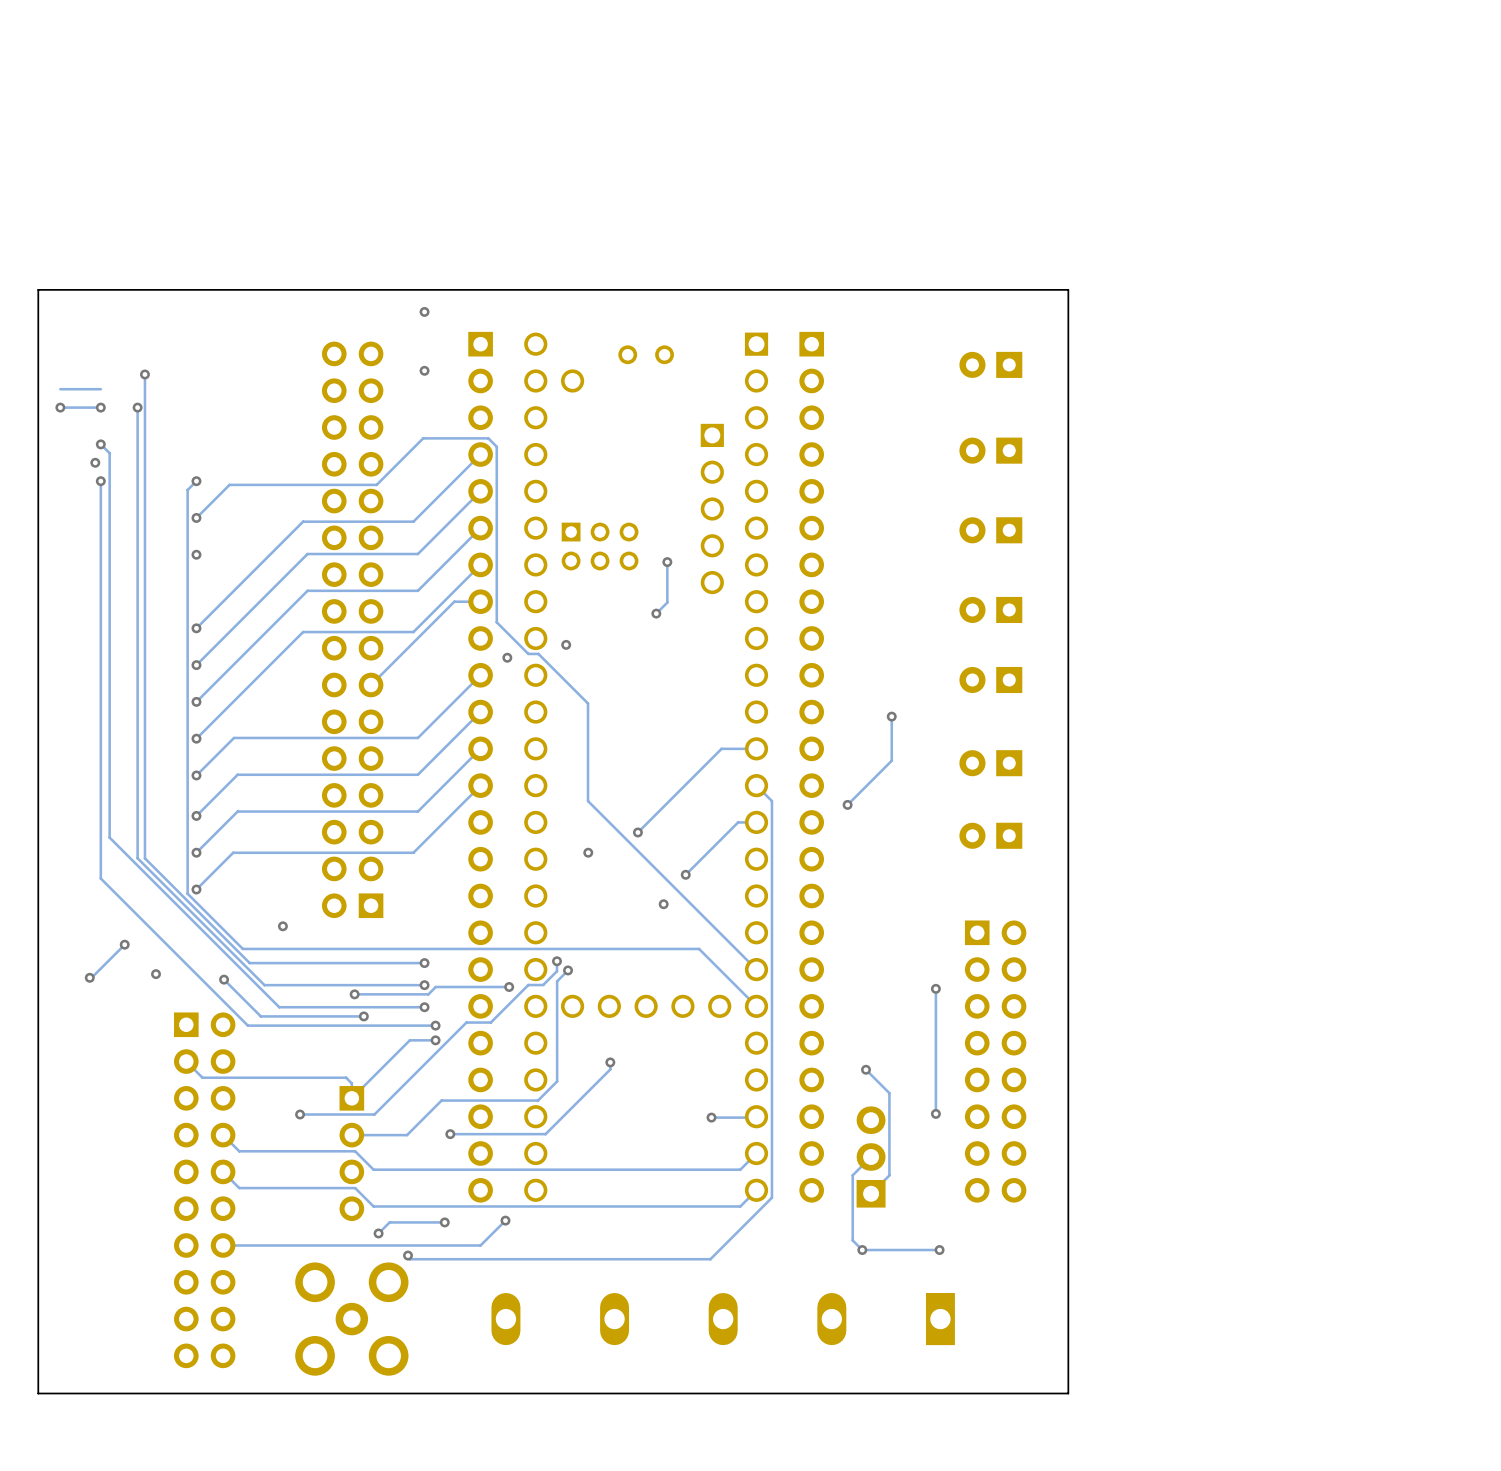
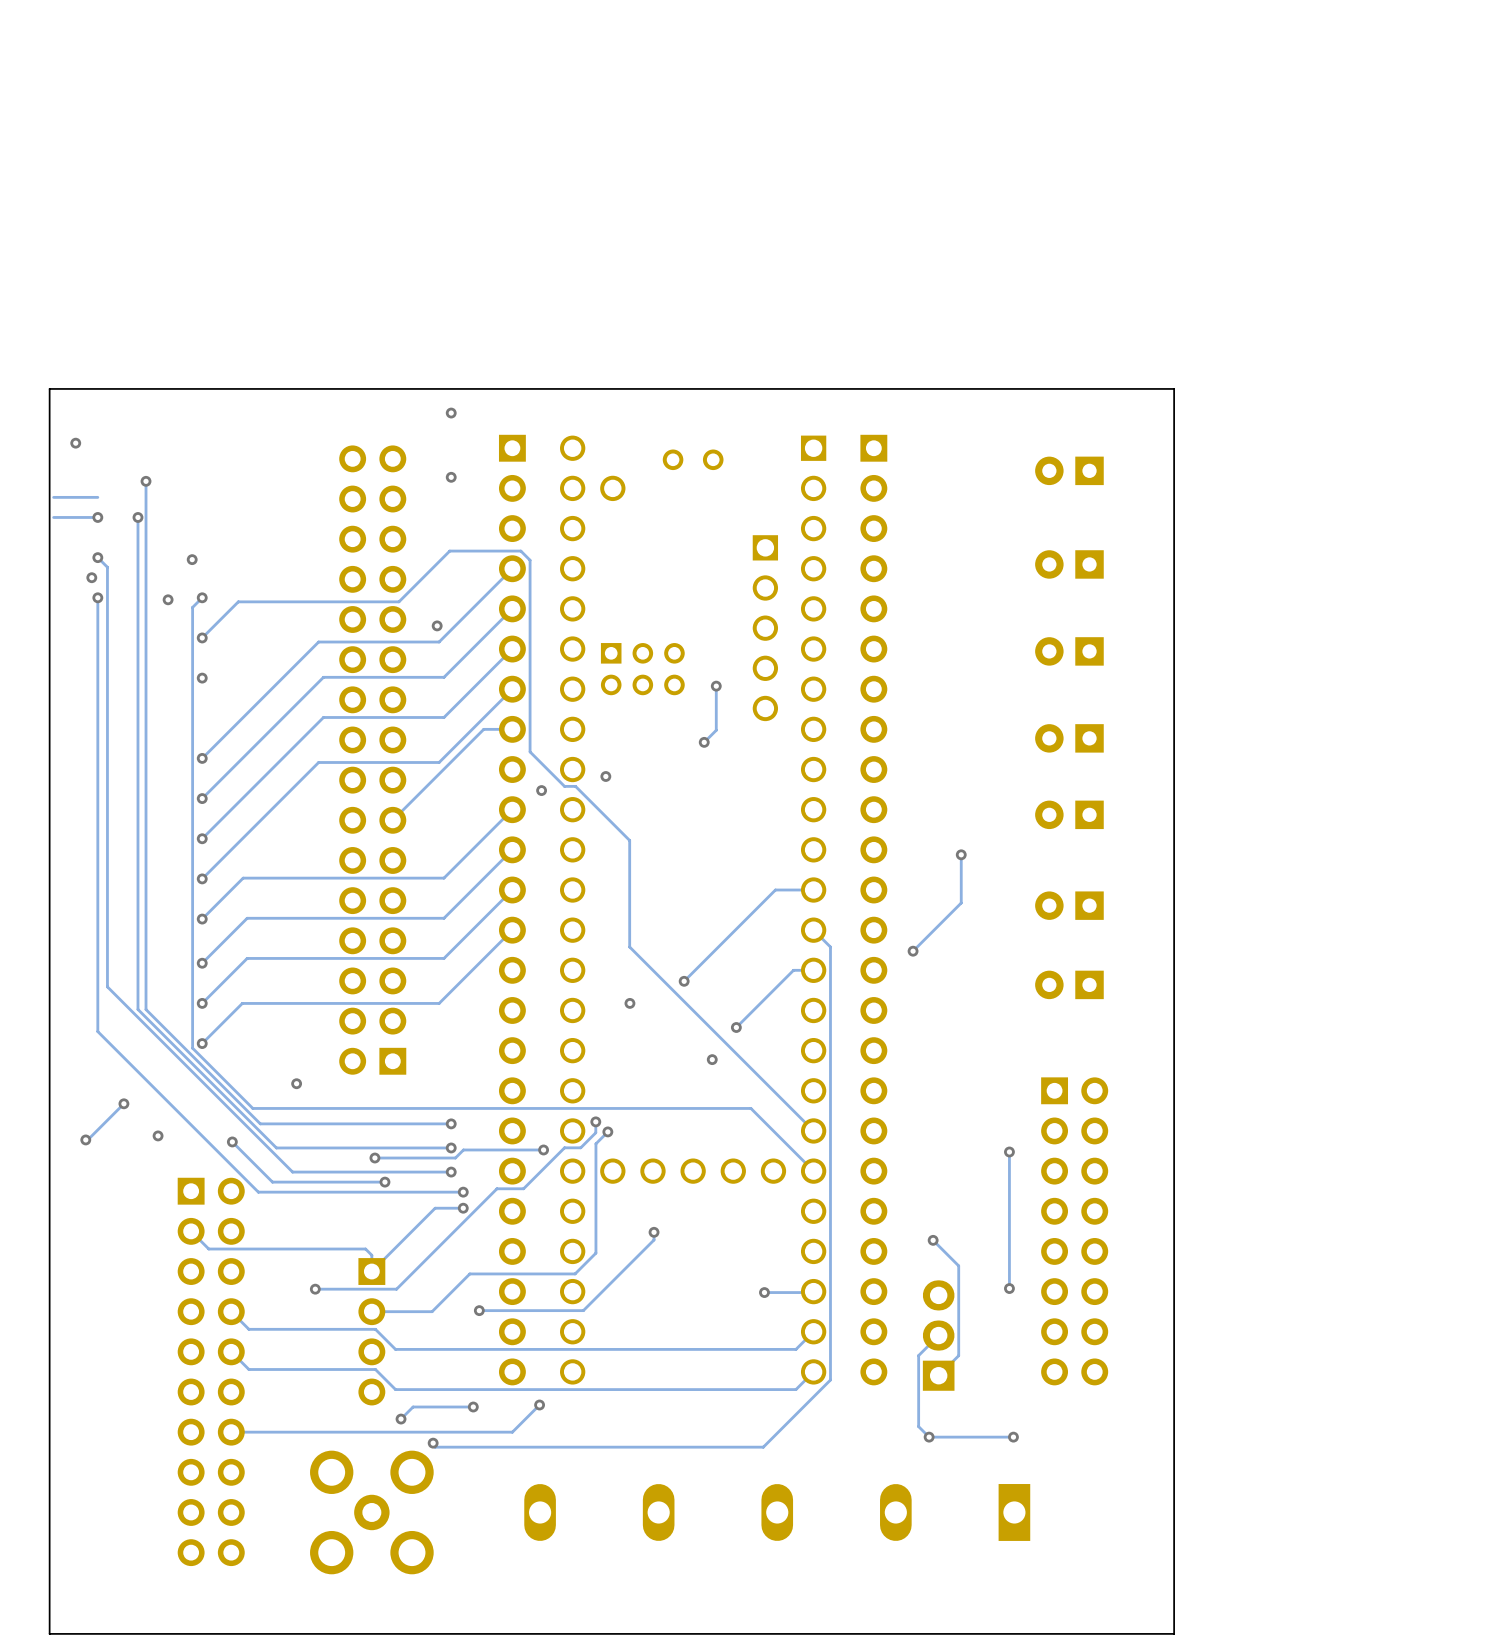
board edge: (1068, 289) (1068, 1393) (38, 1393) (38, 289) (56, 289) -> (1154, 388) (1174, 388) (1174, 1633) (49, 1633) (49, 388)
via: none -> (75, 443)
via: (60, 407) -> none
via: none -> (192, 559)
via: none -> (168, 599)
via: none -> (437, 625)

